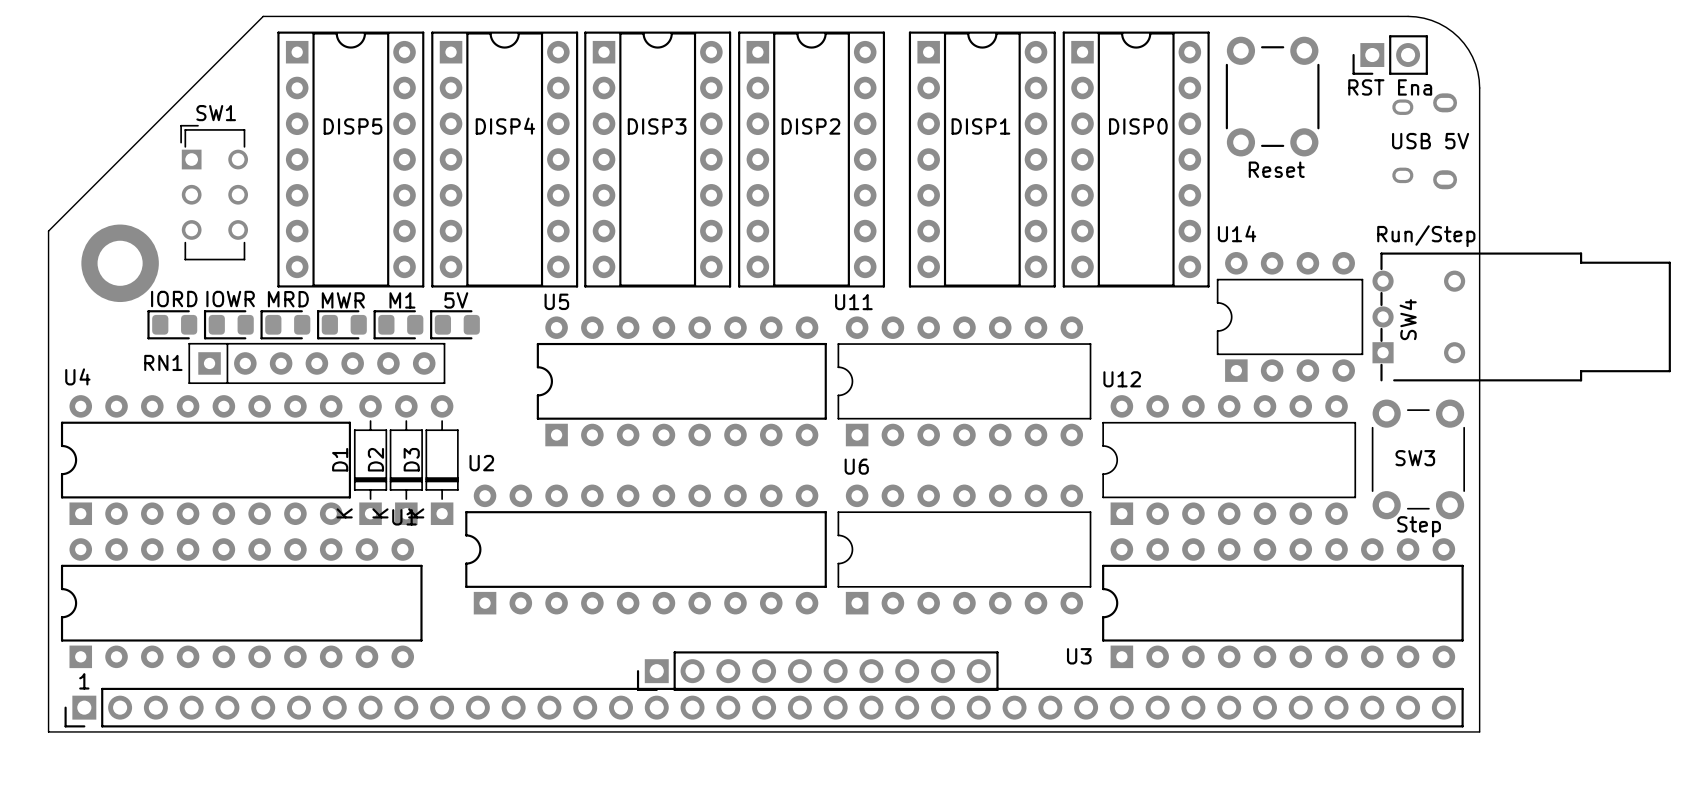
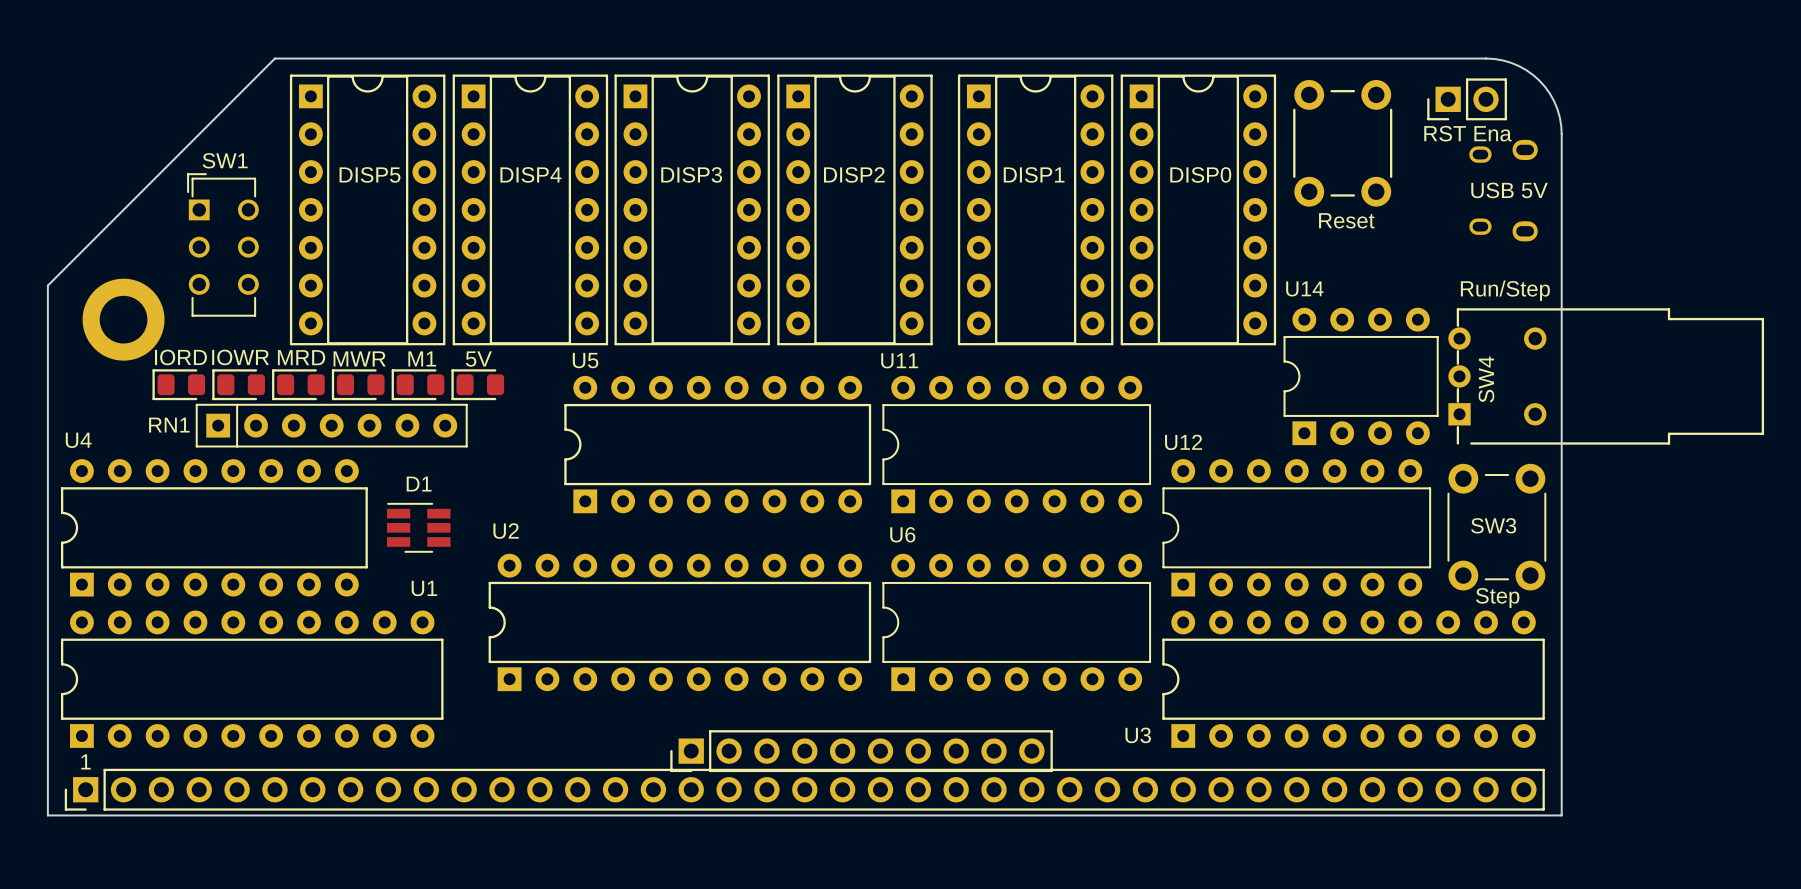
D1 footprint: [353, 395, 388, 525] -> [387, 502, 451, 553]
D1 name position: D1 (340, 459) -> D1 (419, 484)
D2: (406, 460) -> none
D3: (442, 460) -> none

